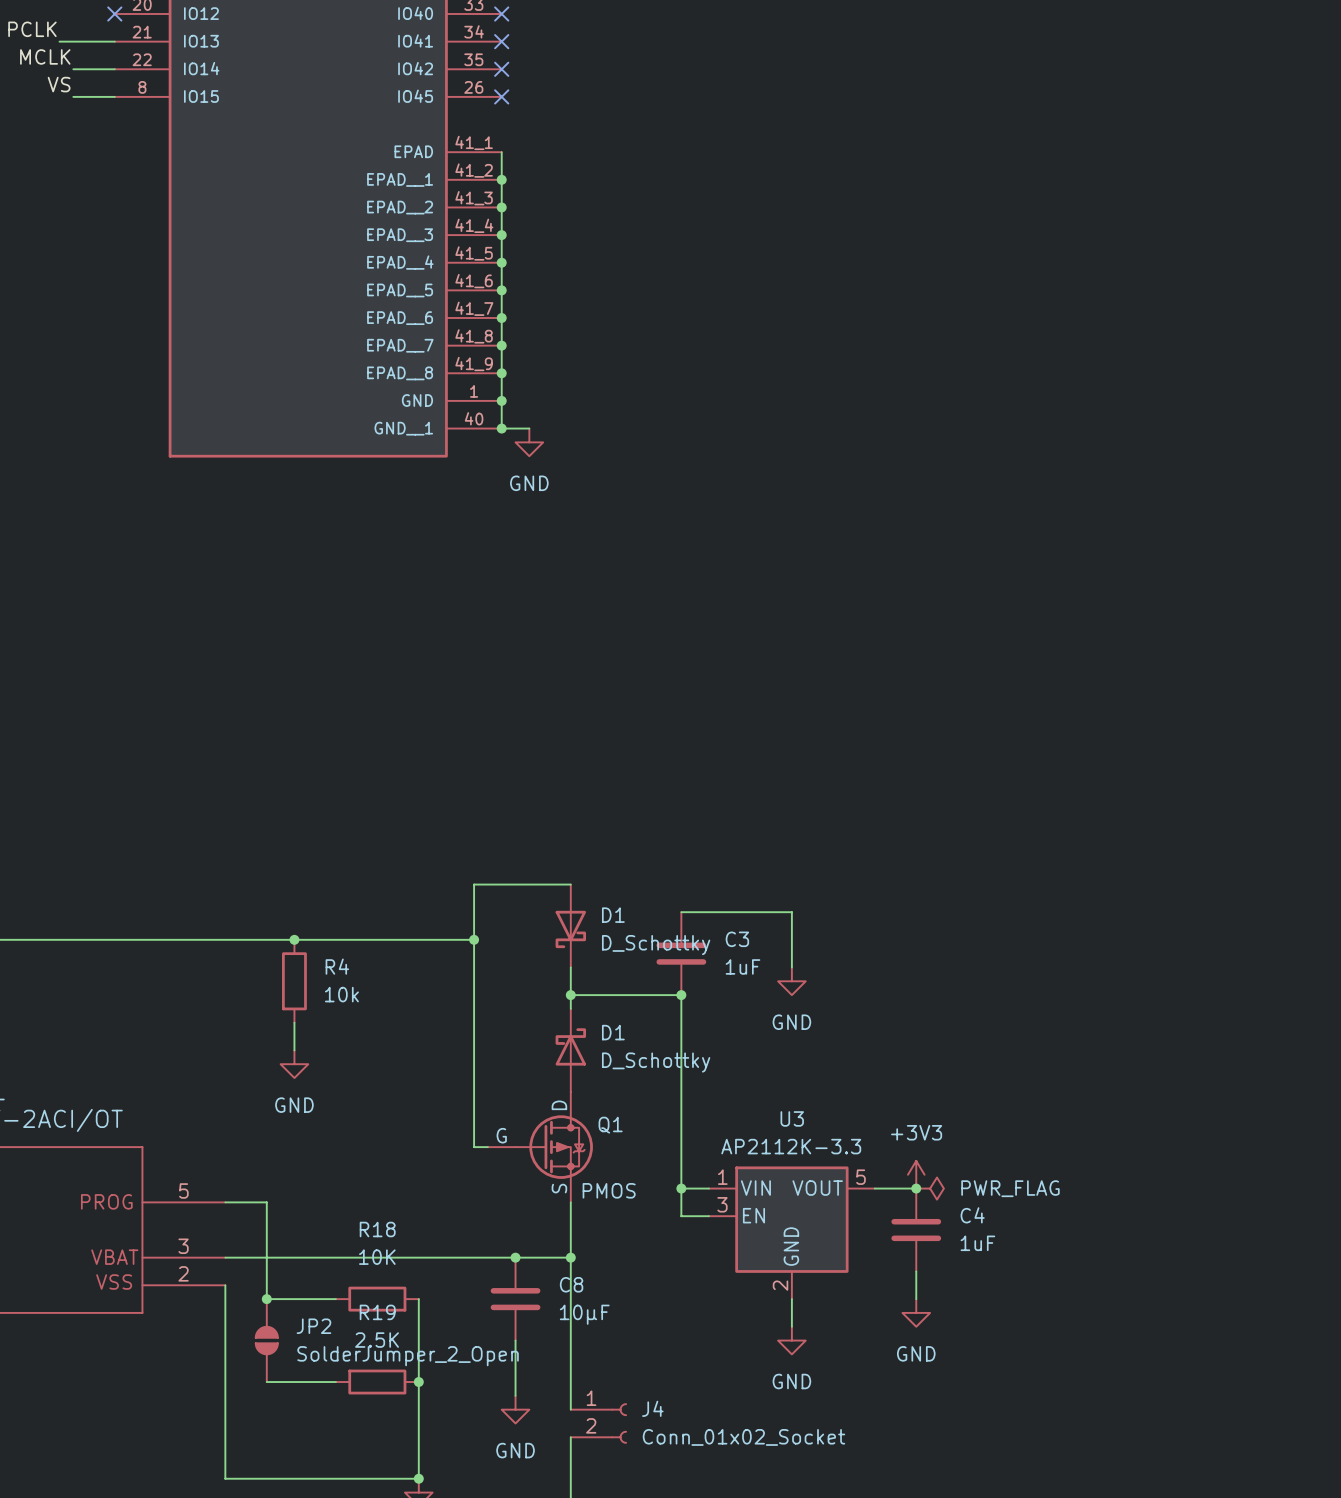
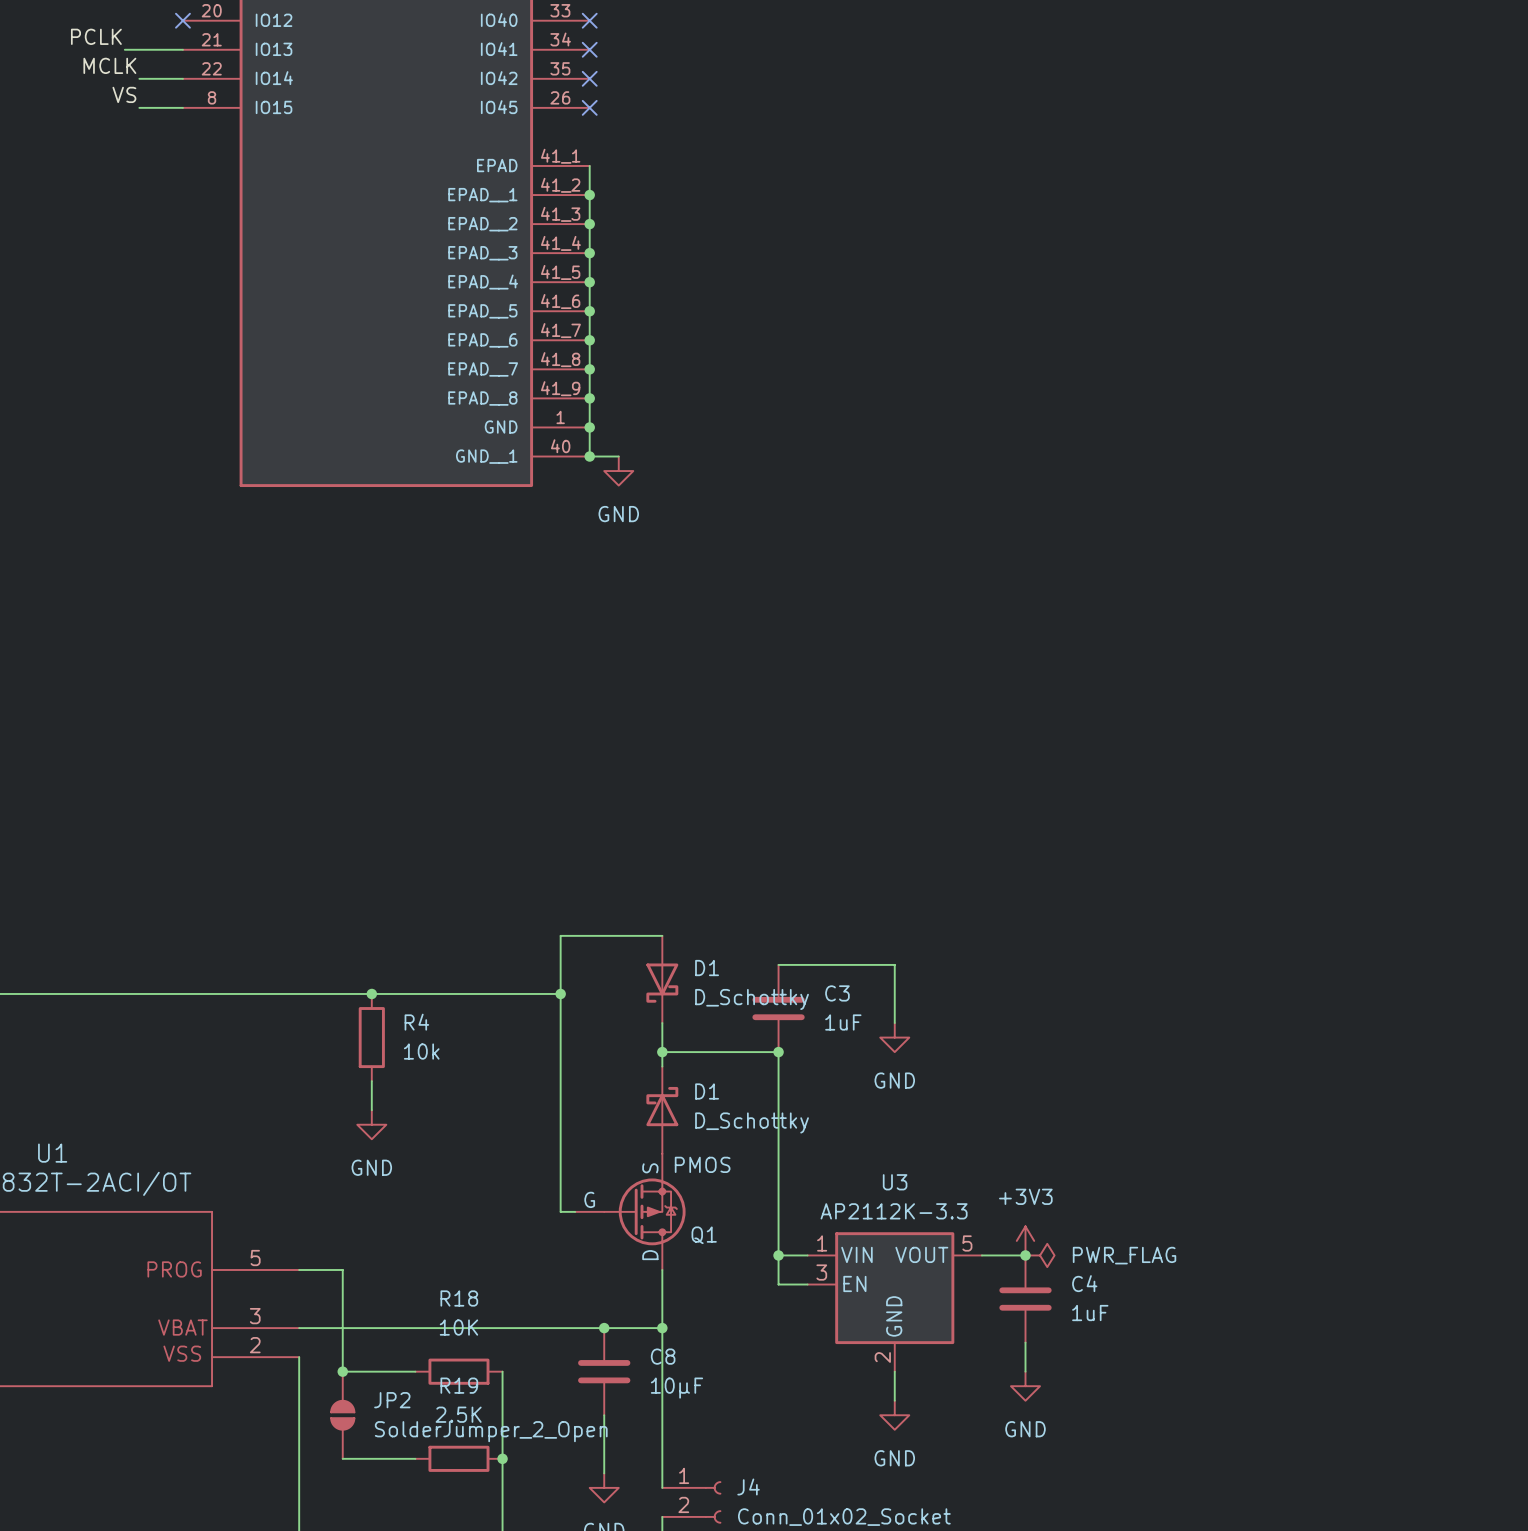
Q1 flip: as is (554, 1147) -> up-down (644, 1211)

